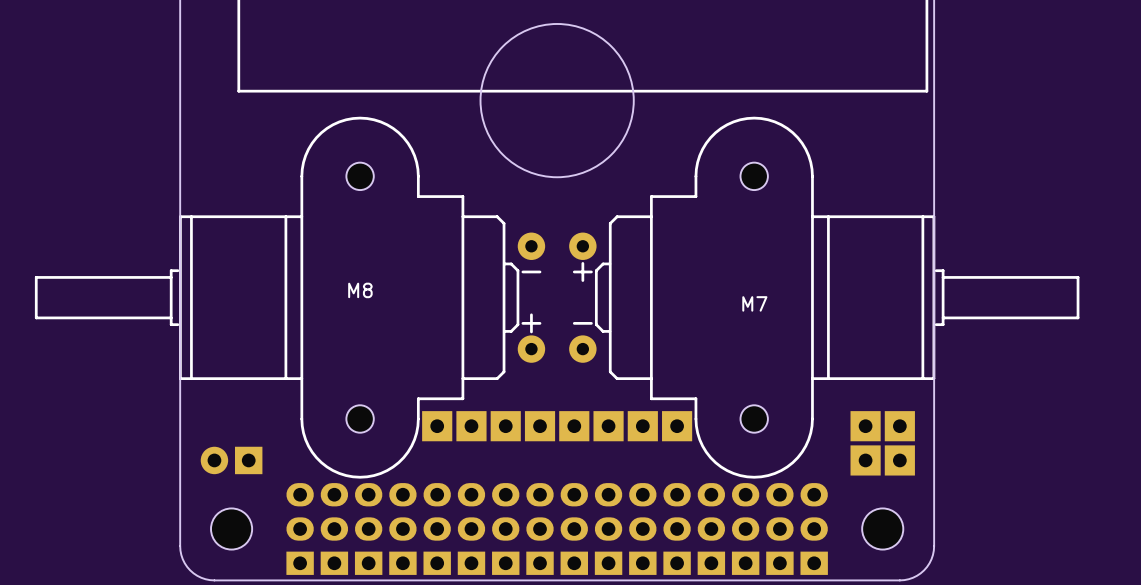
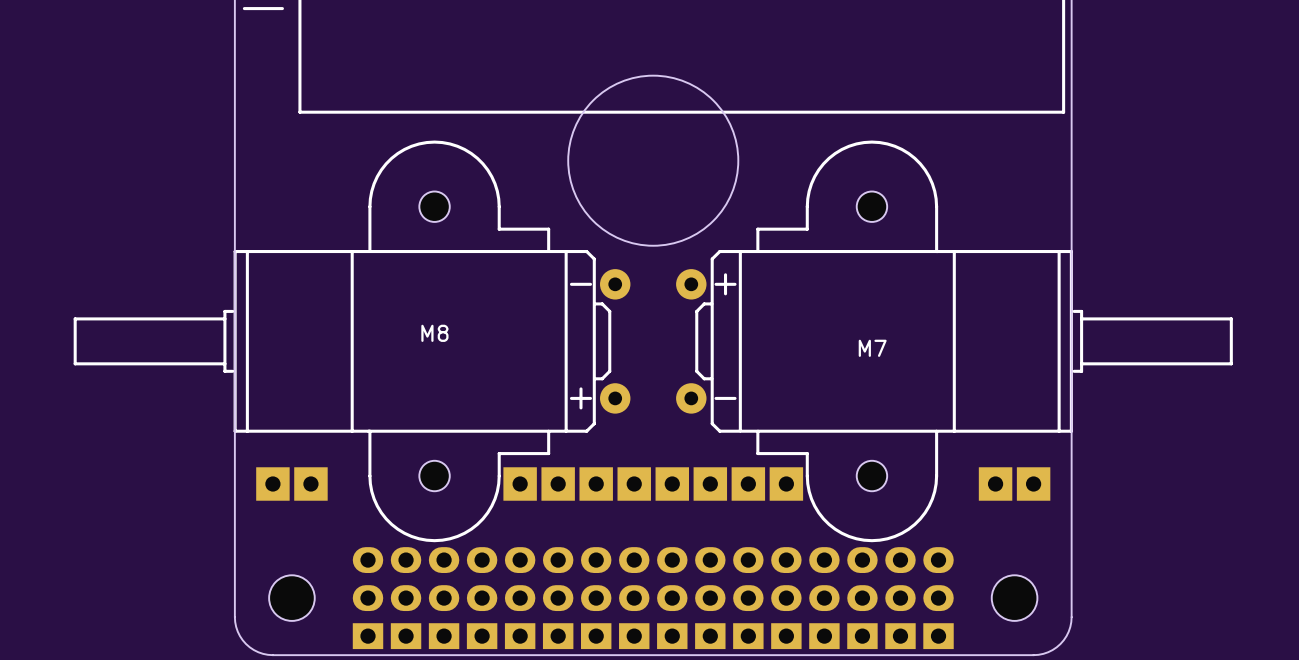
round board edge position: (557, 100) -> (653, 160)
M8 footprint: [34, 116, 546, 479] -> [73, 140, 631, 543]
M7 footprint: [569, 116, 1080, 479] -> [676, 140, 1233, 543]
part: none -> (272, 483)
part: none -> (310, 483)
part: (231, 460) -> none
part: (865, 460) -> none
part: (899, 460) -> none

